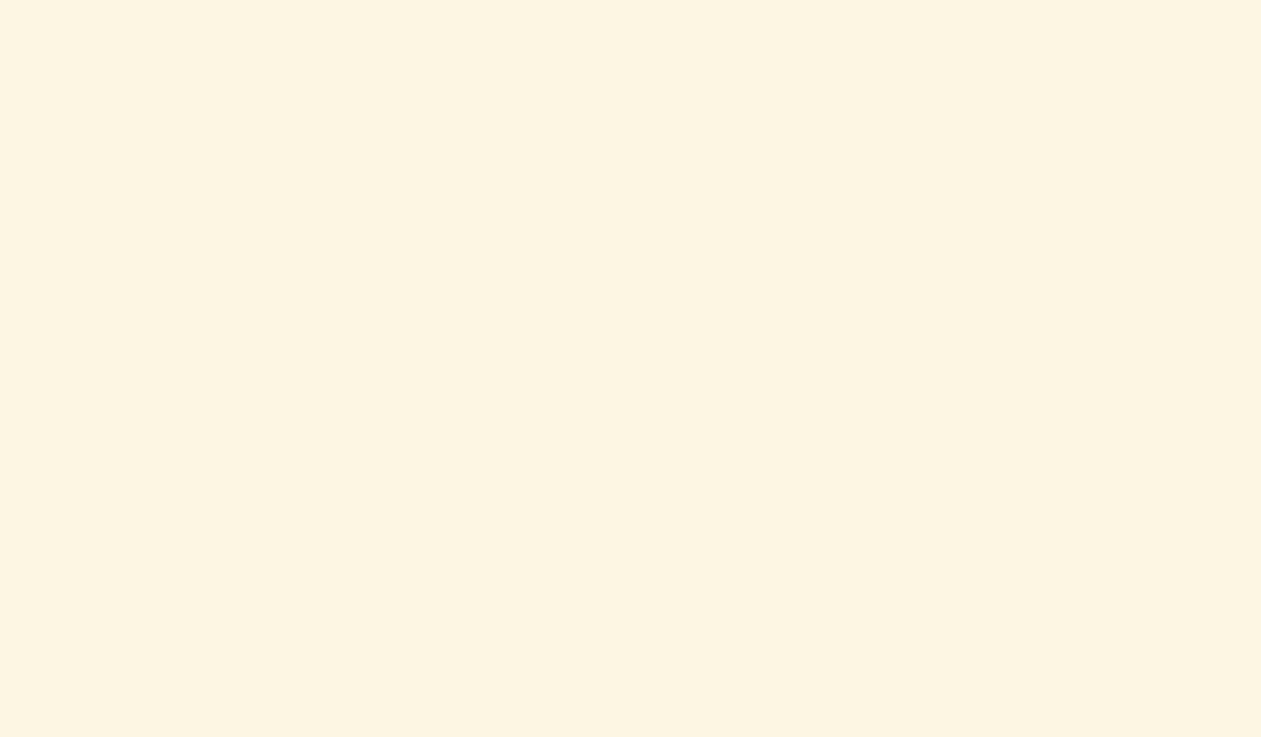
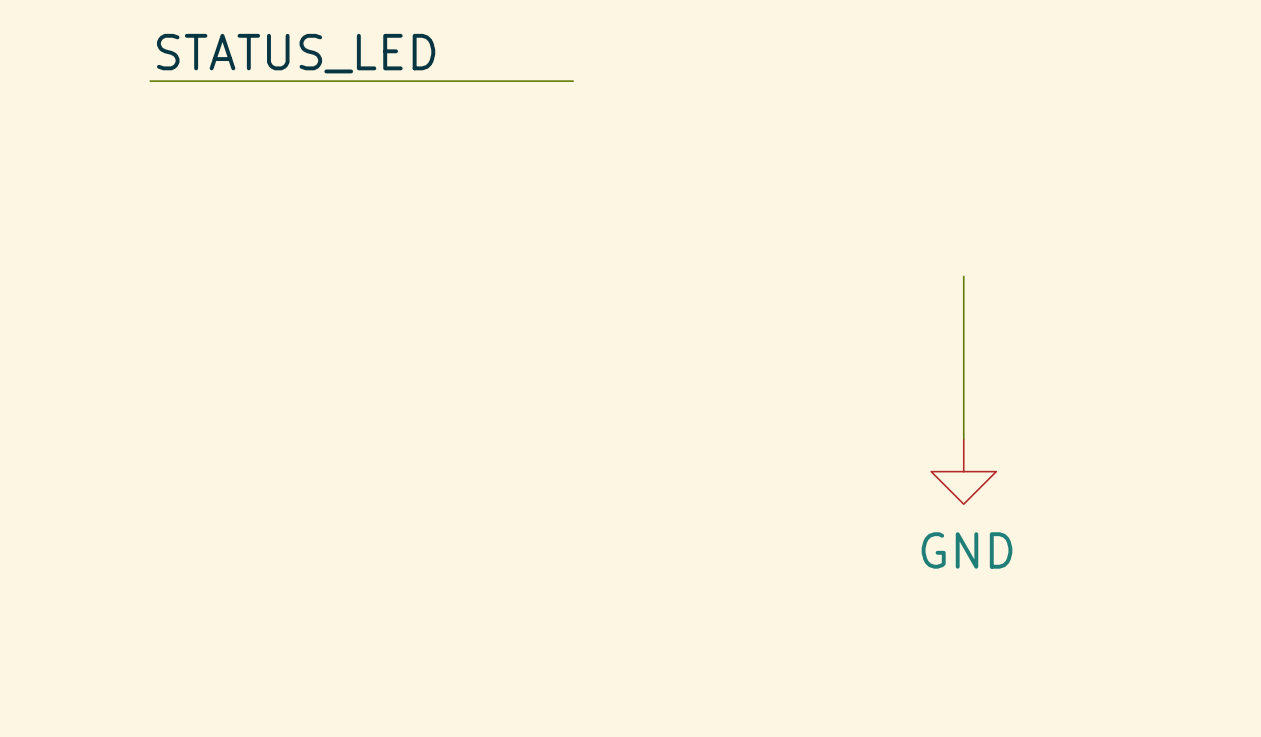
label: none -> STATUS_LED (296, 53)
wire: none -> (150, 81) (573, 81)
wire: none -> (963, 276) (963, 439)
power symbol: none -> GND (963, 471)

